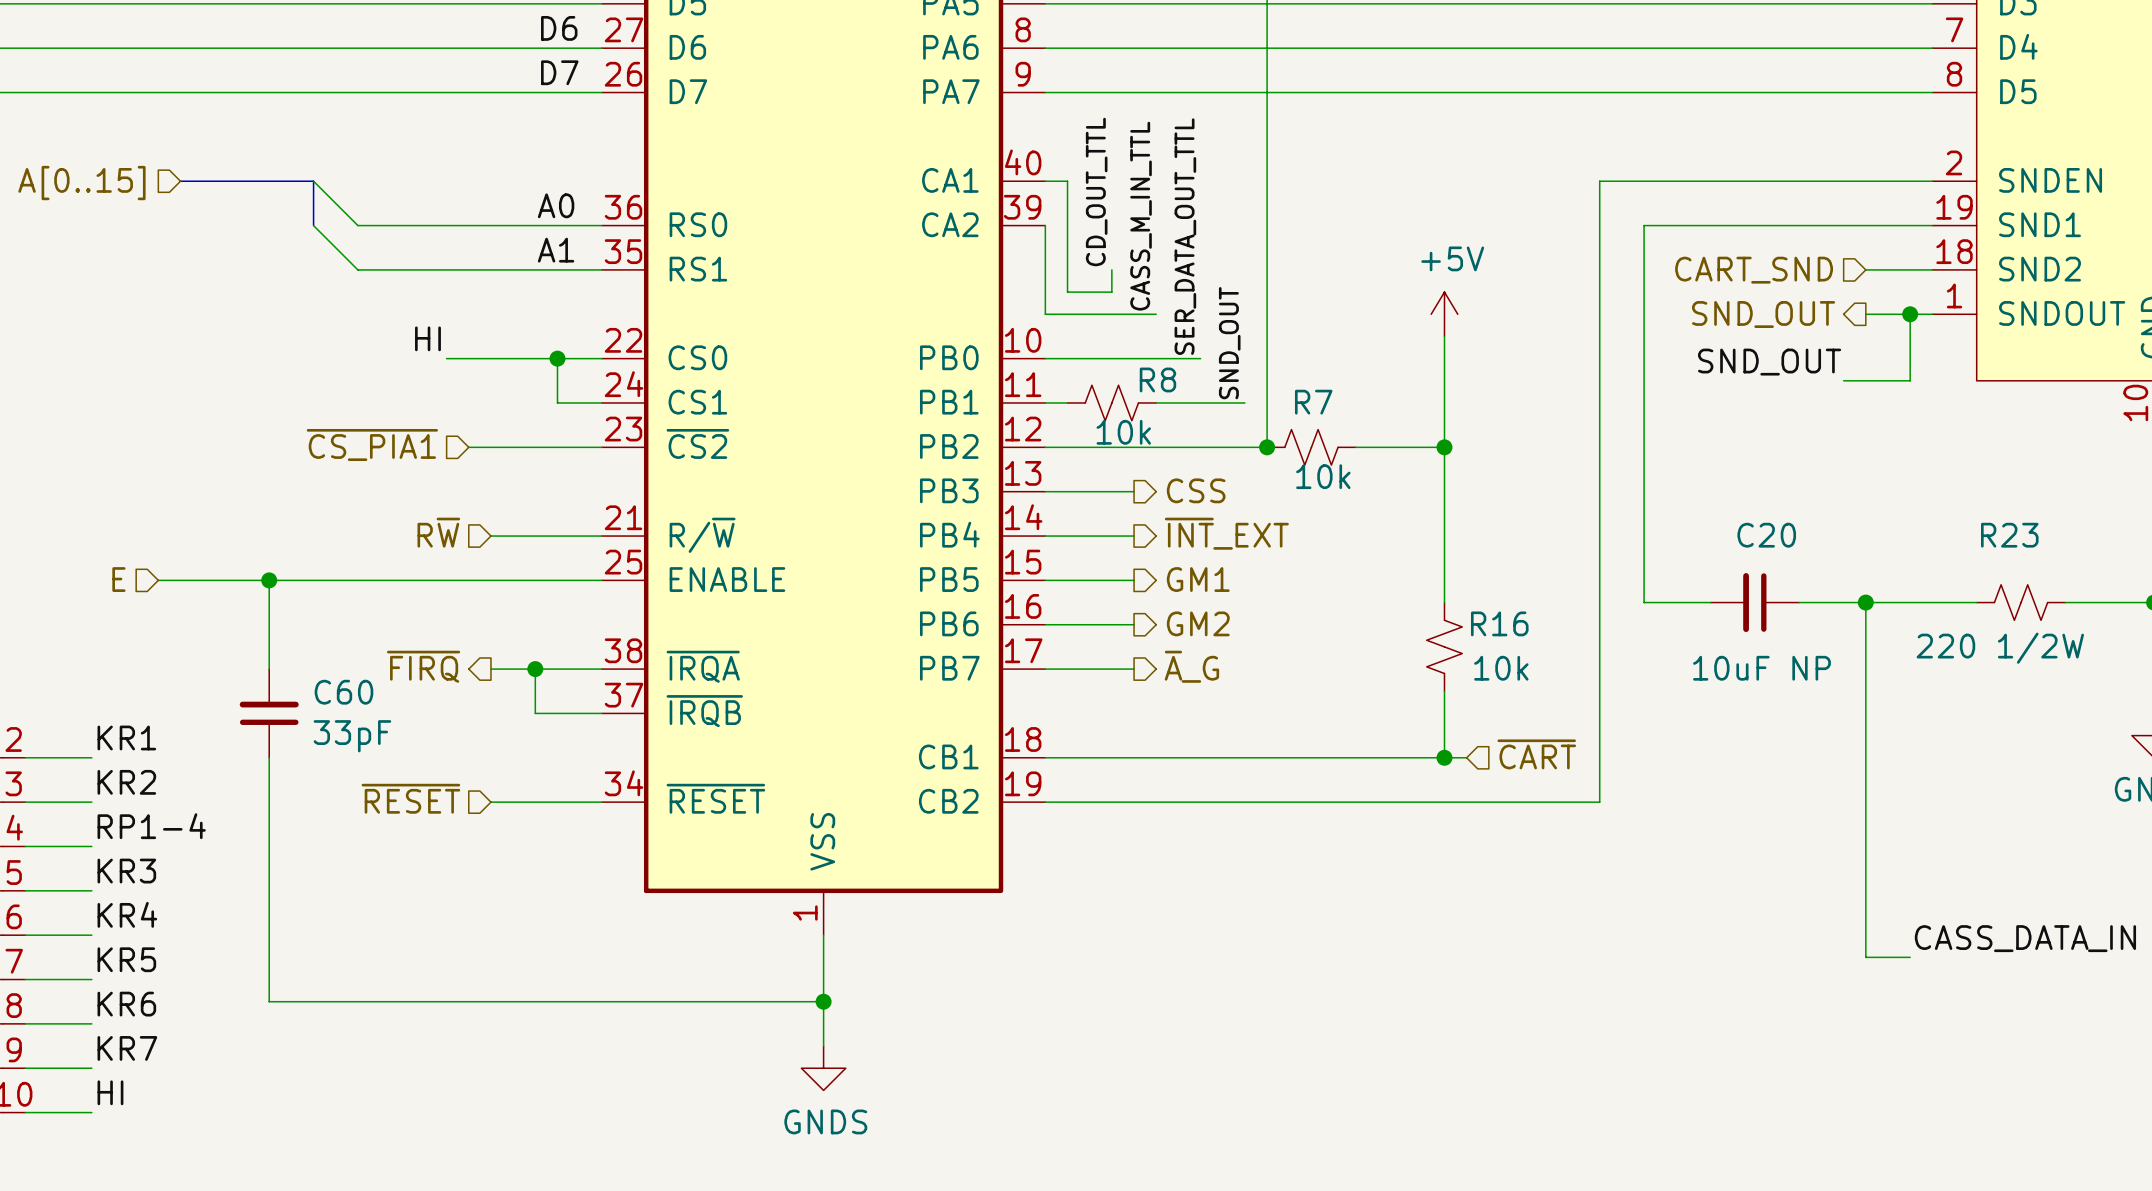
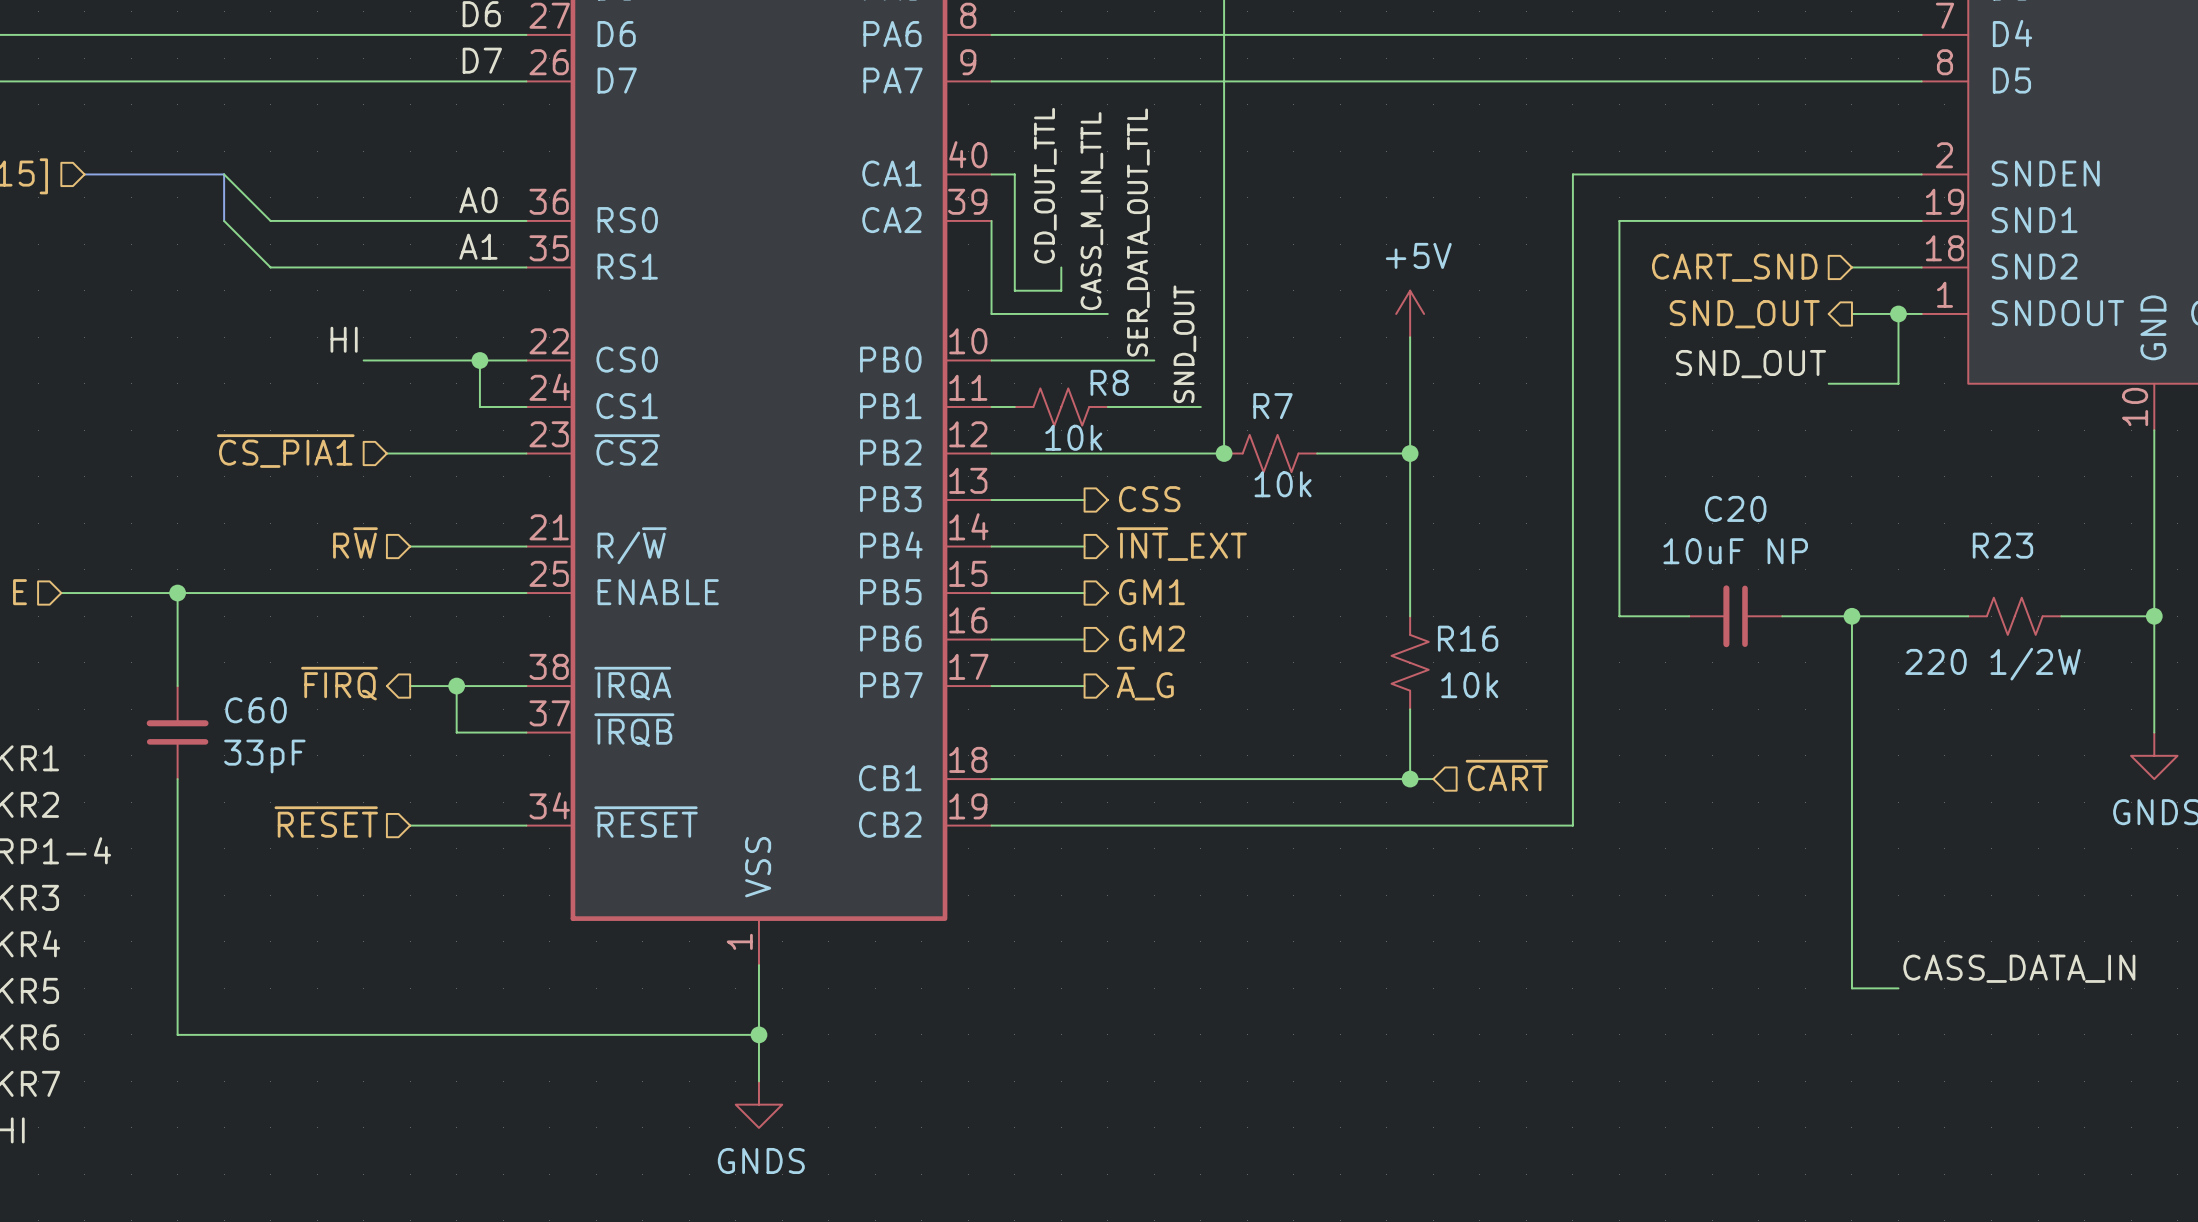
C20 name position: C20 (1766, 535) -> C20 (1735, 508)
C20 value position: 10uF NP (1761, 668) -> 10uF NP (1735, 551)

